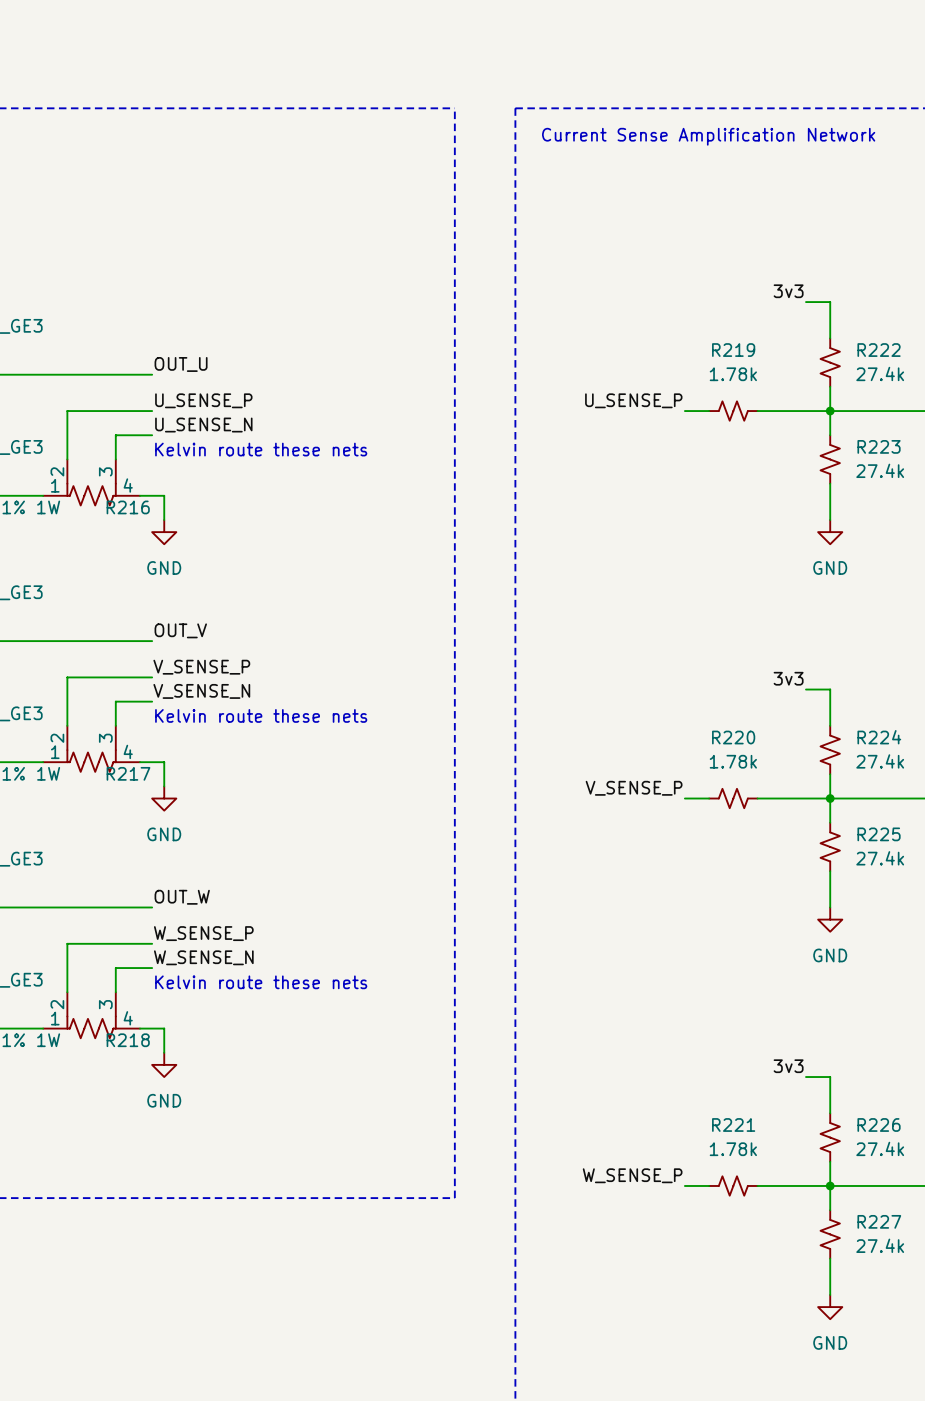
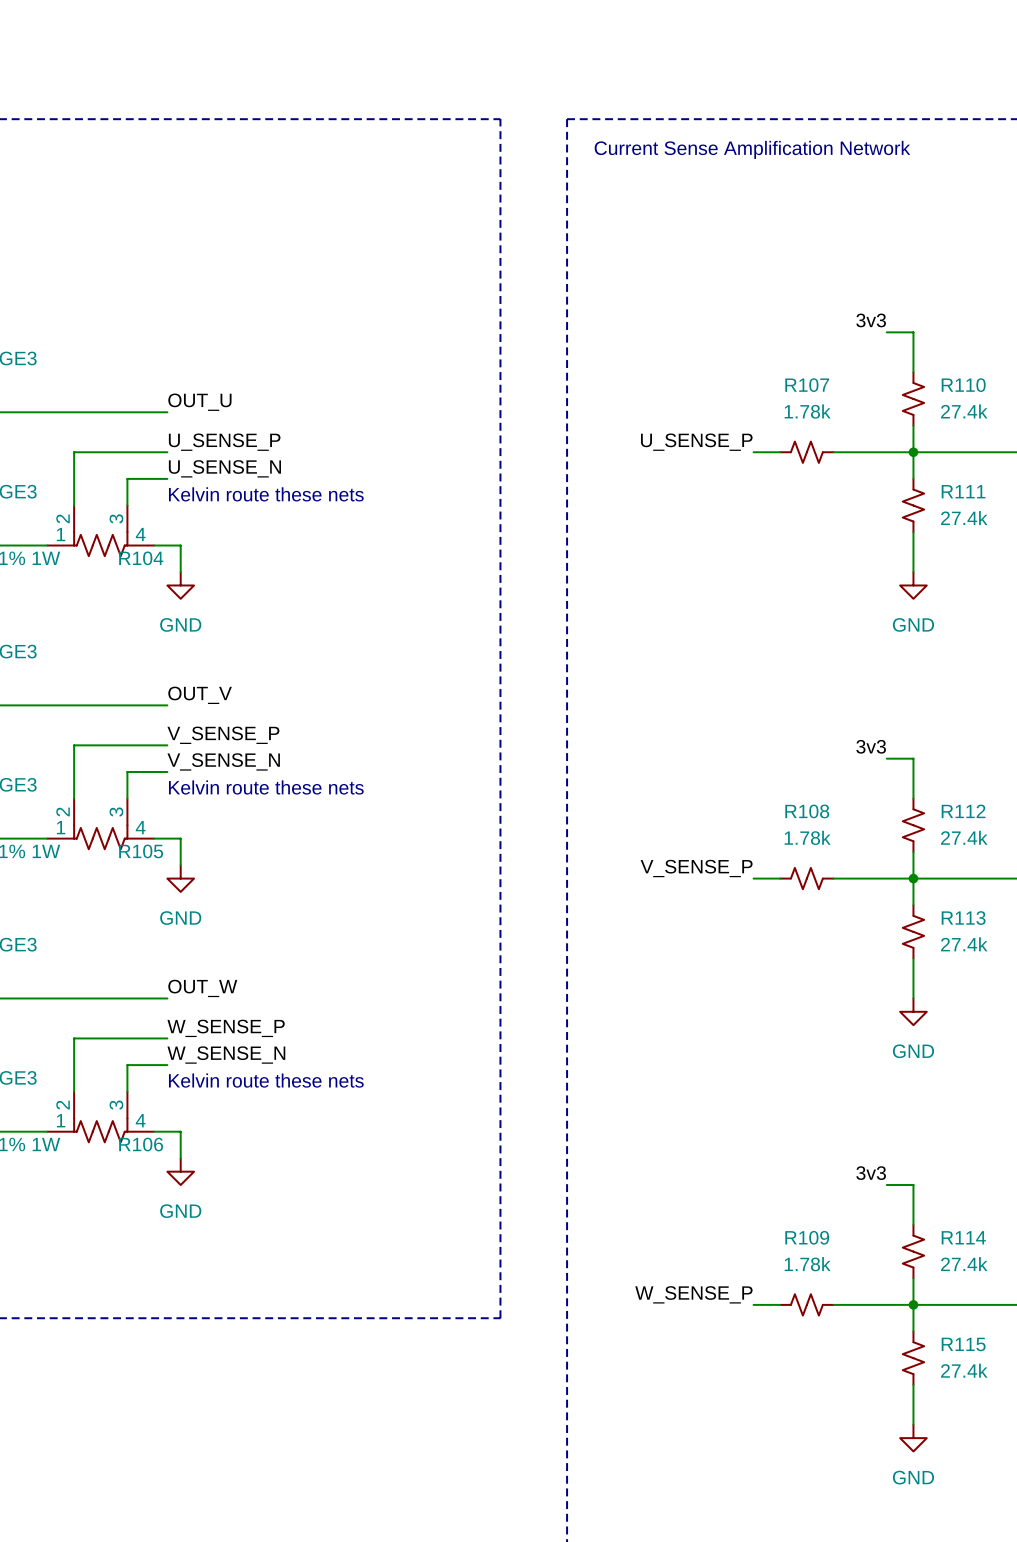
R219 name: R219 (733, 350) -> R107 (807, 385)
R222 name: R222 (879, 350) -> R110 (963, 385)
R223 name: R223 (879, 446) -> R111 (963, 491)
R216 name: R216 (128, 507) -> R104 (141, 558)
R220 name: R220 (733, 737) -> R108 (807, 811)
R224 name: R224 (879, 737) -> R112 (963, 811)
R217 name: R217 (128, 773) -> R105 (141, 851)
R225 name: R225 (879, 834) -> R113 (963, 918)
R218 name: R218 (128, 1040) -> R106 (141, 1144)
R221 name: R221 (733, 1124) -> R109 (807, 1237)
R226 name: R226 (879, 1124) -> R114 (963, 1237)
R227 name: R227 (879, 1221) -> R115 (963, 1344)

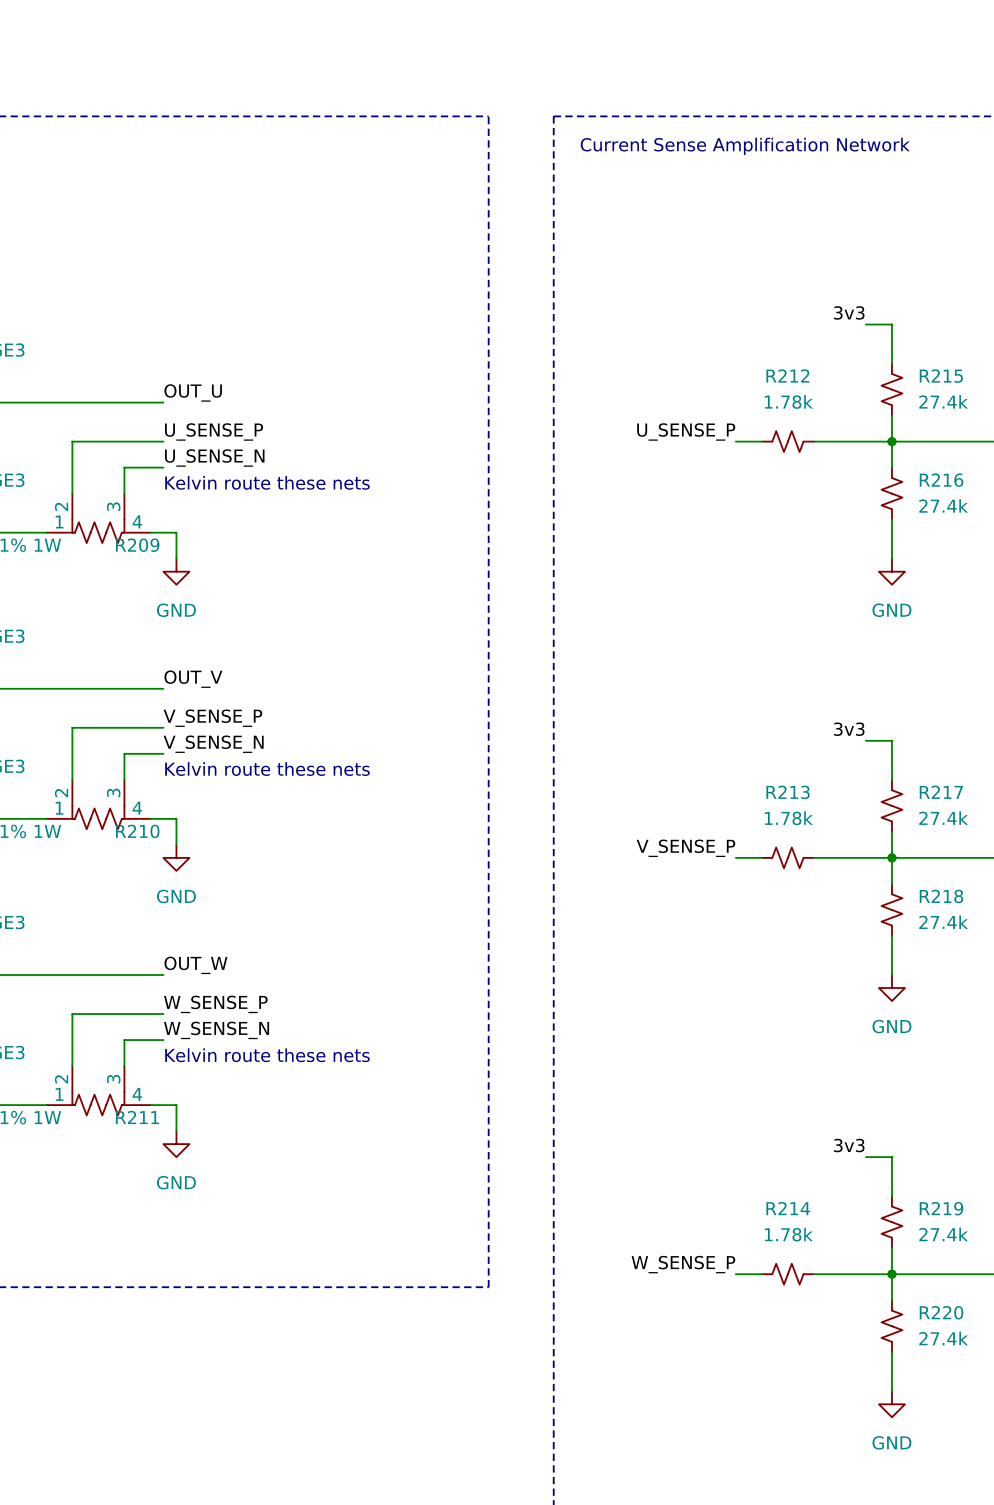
R107 name: R107 (807, 385) -> R212 (787, 375)
R110 name: R110 (963, 385) -> R215 (941, 376)
R111 name: R111 (963, 491) -> R216 (941, 480)
R104 name: R104 (141, 558) -> R209 (137, 545)
R108 name: R108 (807, 811) -> R213 (788, 792)
R112 name: R112 (963, 811) -> R217 (941, 792)
R105 name: R105 (141, 851) -> R210 (137, 831)
R113 name: R113 (963, 918) -> R218 (941, 896)
R106 name: R106 (141, 1144) -> R211 (137, 1117)
R109 name: R109 (807, 1237) -> R214 (788, 1208)
R114 name: R114 (963, 1237) -> R219 (941, 1208)
R115 name: R115 (963, 1344) -> R220 (941, 1312)

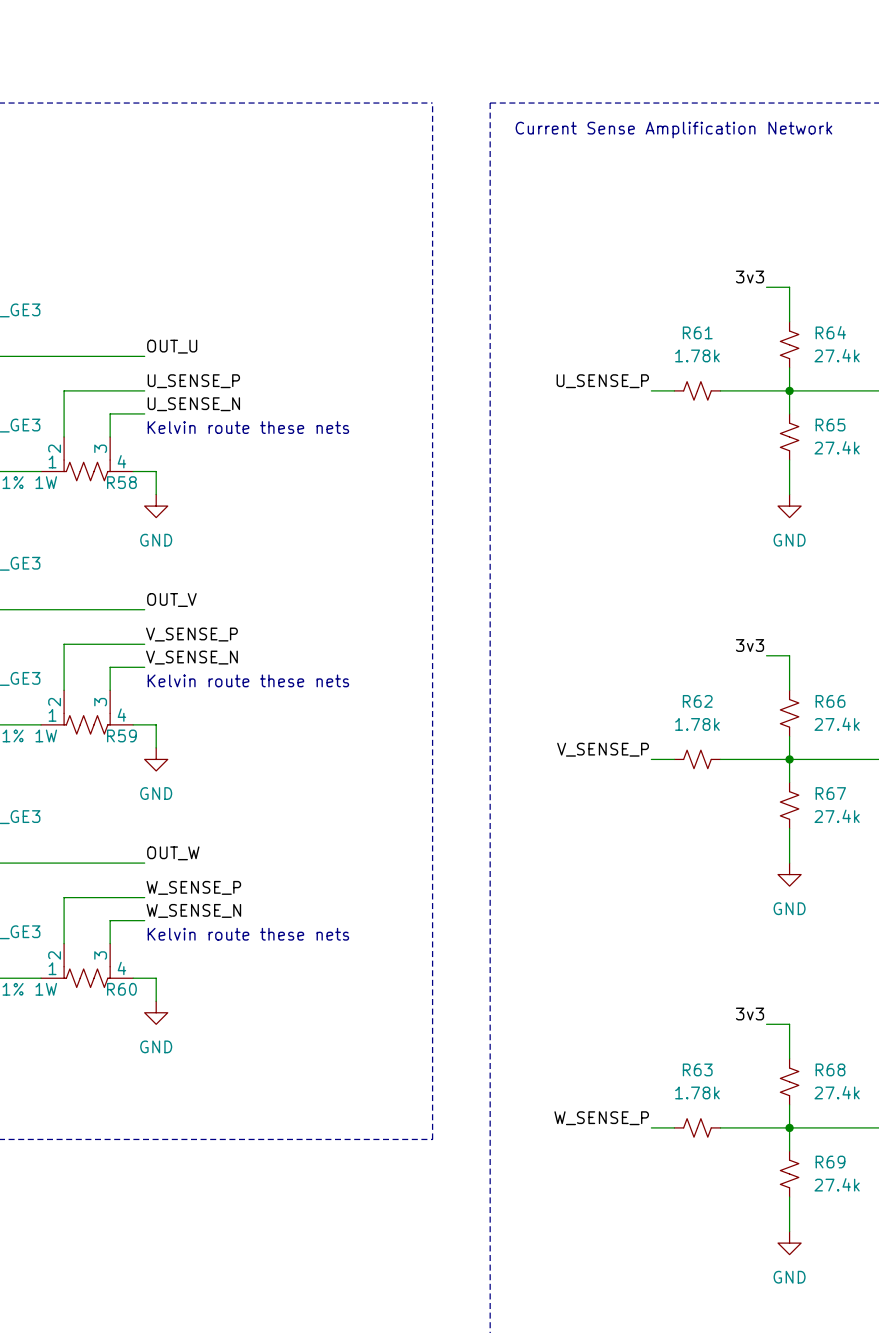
R212 name: R212 (787, 375) -> R61 (697, 332)
R215 name: R215 (941, 376) -> R64 (830, 332)
R216 name: R216 (941, 480) -> R65 (830, 425)
R209 name: R209 (137, 545) -> R58 (121, 482)
R213 name: R213 (788, 792) -> R62 (697, 701)
R217 name: R217 (941, 792) -> R66 (830, 701)
R210 name: R210 (137, 831) -> R59 (121, 735)
R218 name: R218 (941, 896) -> R67 (830, 793)
R211 name: R211 (137, 1117) -> R60 (121, 989)
R214 name: R214 (788, 1208) -> R63 (697, 1069)
R219 name: R219 (941, 1208) -> R68 (830, 1069)
R220 name: R220 (941, 1312) -> R69 (830, 1162)

